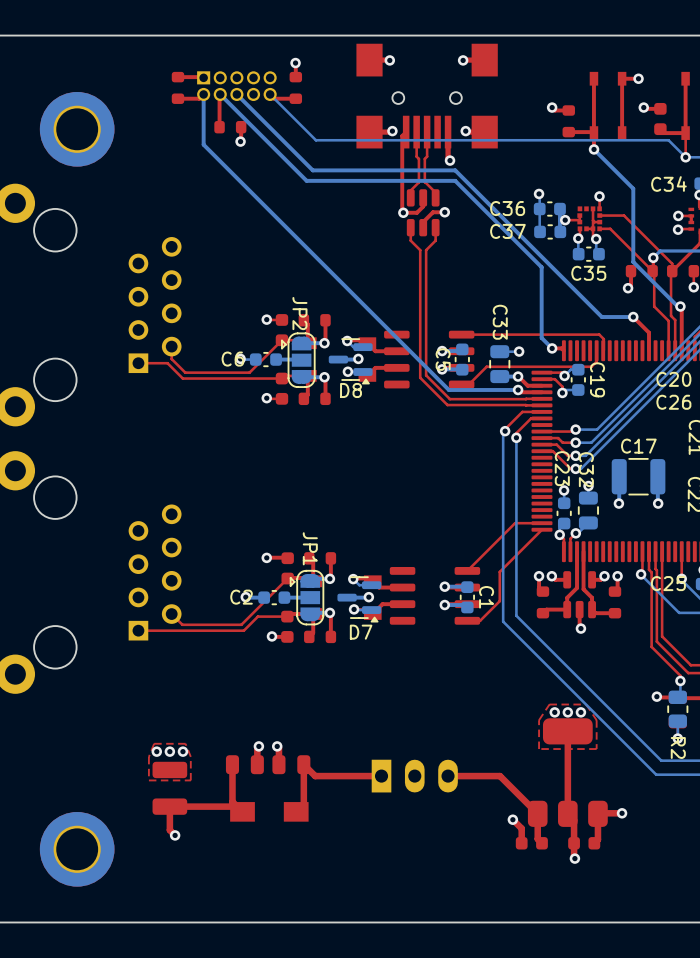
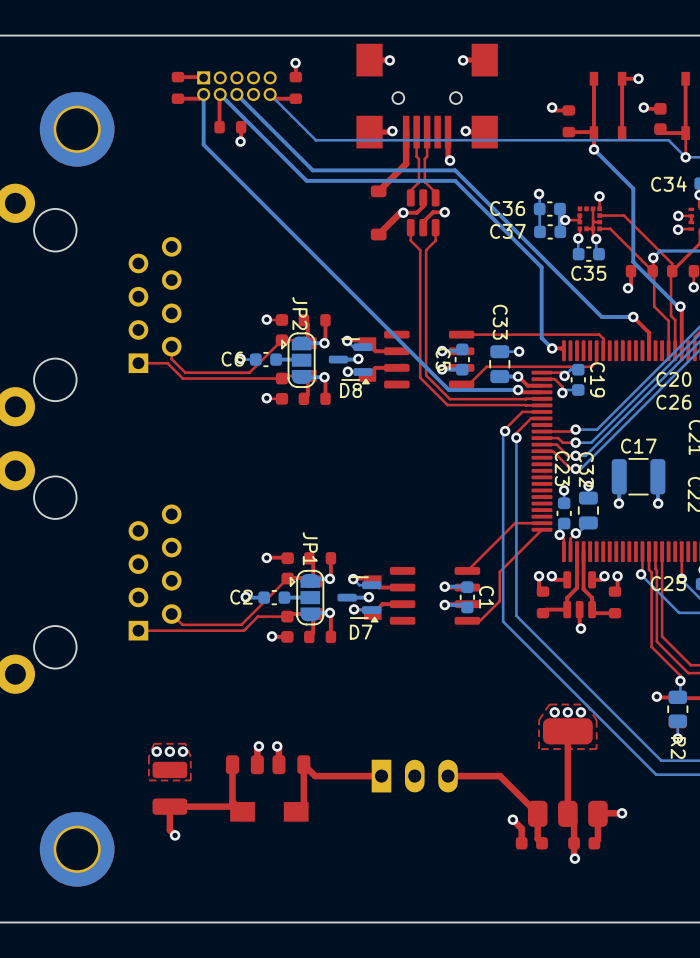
top track: (406, 132) (402, 136) (403, 212) -> (406, 132) (406, 163) (378, 191)
part: none -> (378, 212)
top track: none -> (403, 212) (400, 212) (378, 234)

